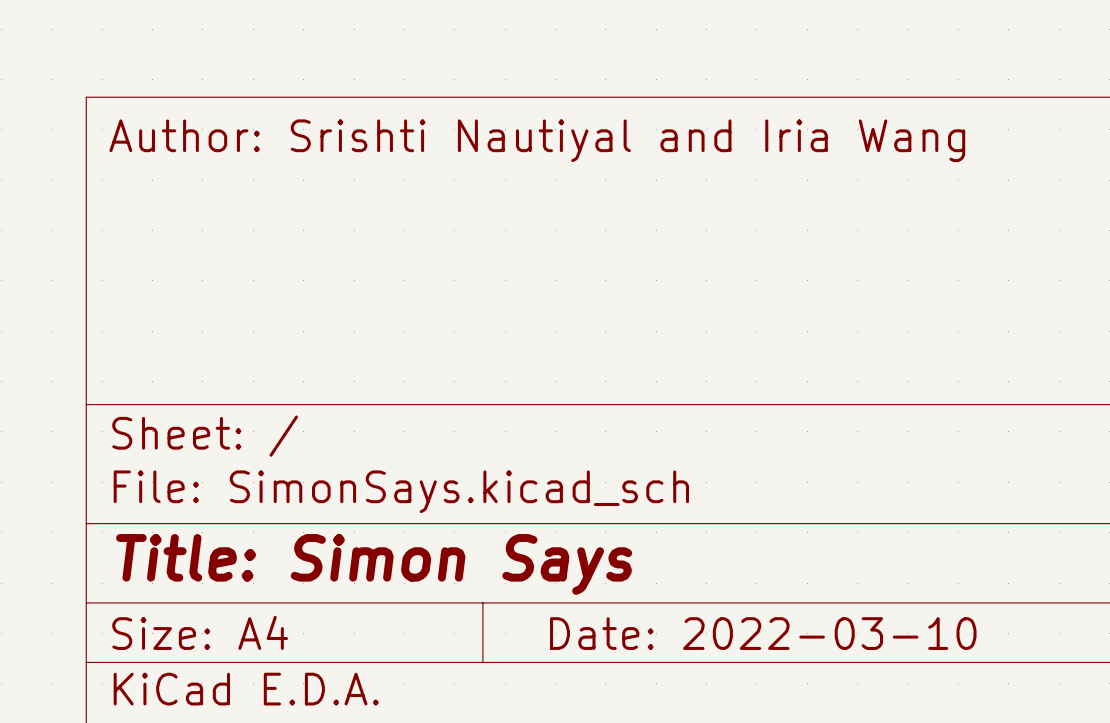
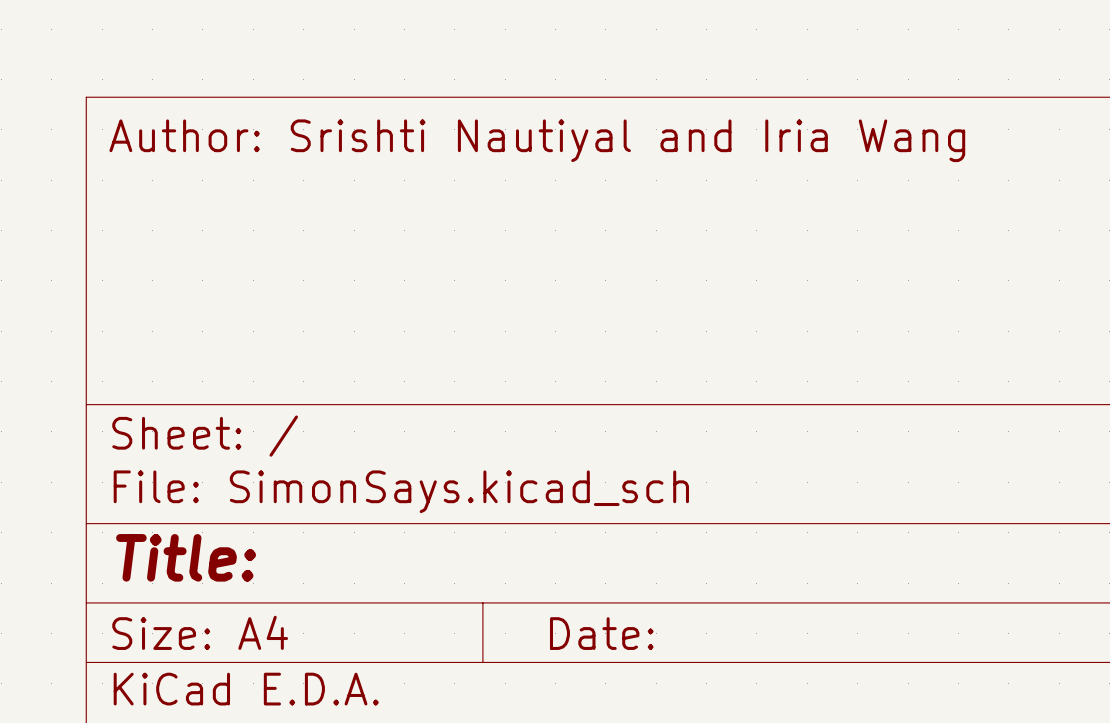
title block: Title: Simon Says (374, 564) -> Title: (186, 557)
title block: Date: 2022-03-10 (763, 633) -> Date: (601, 633)

